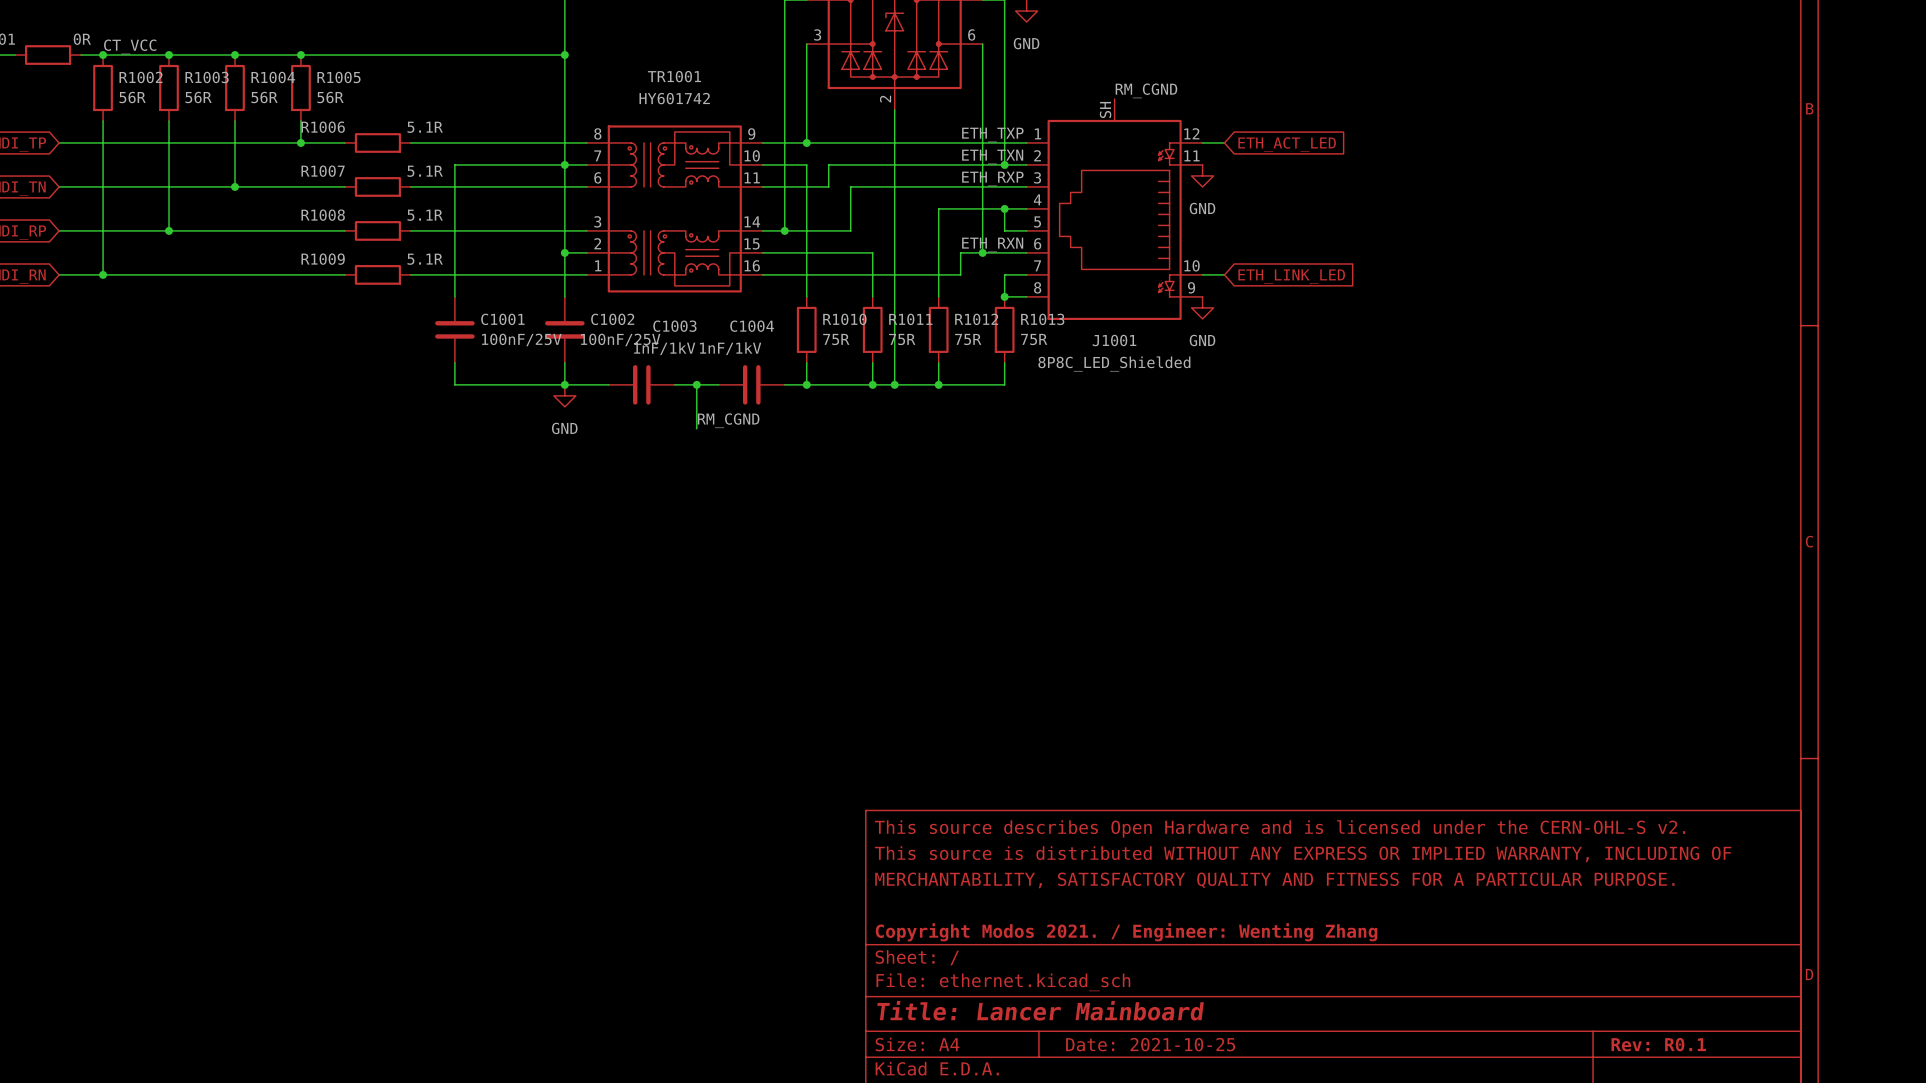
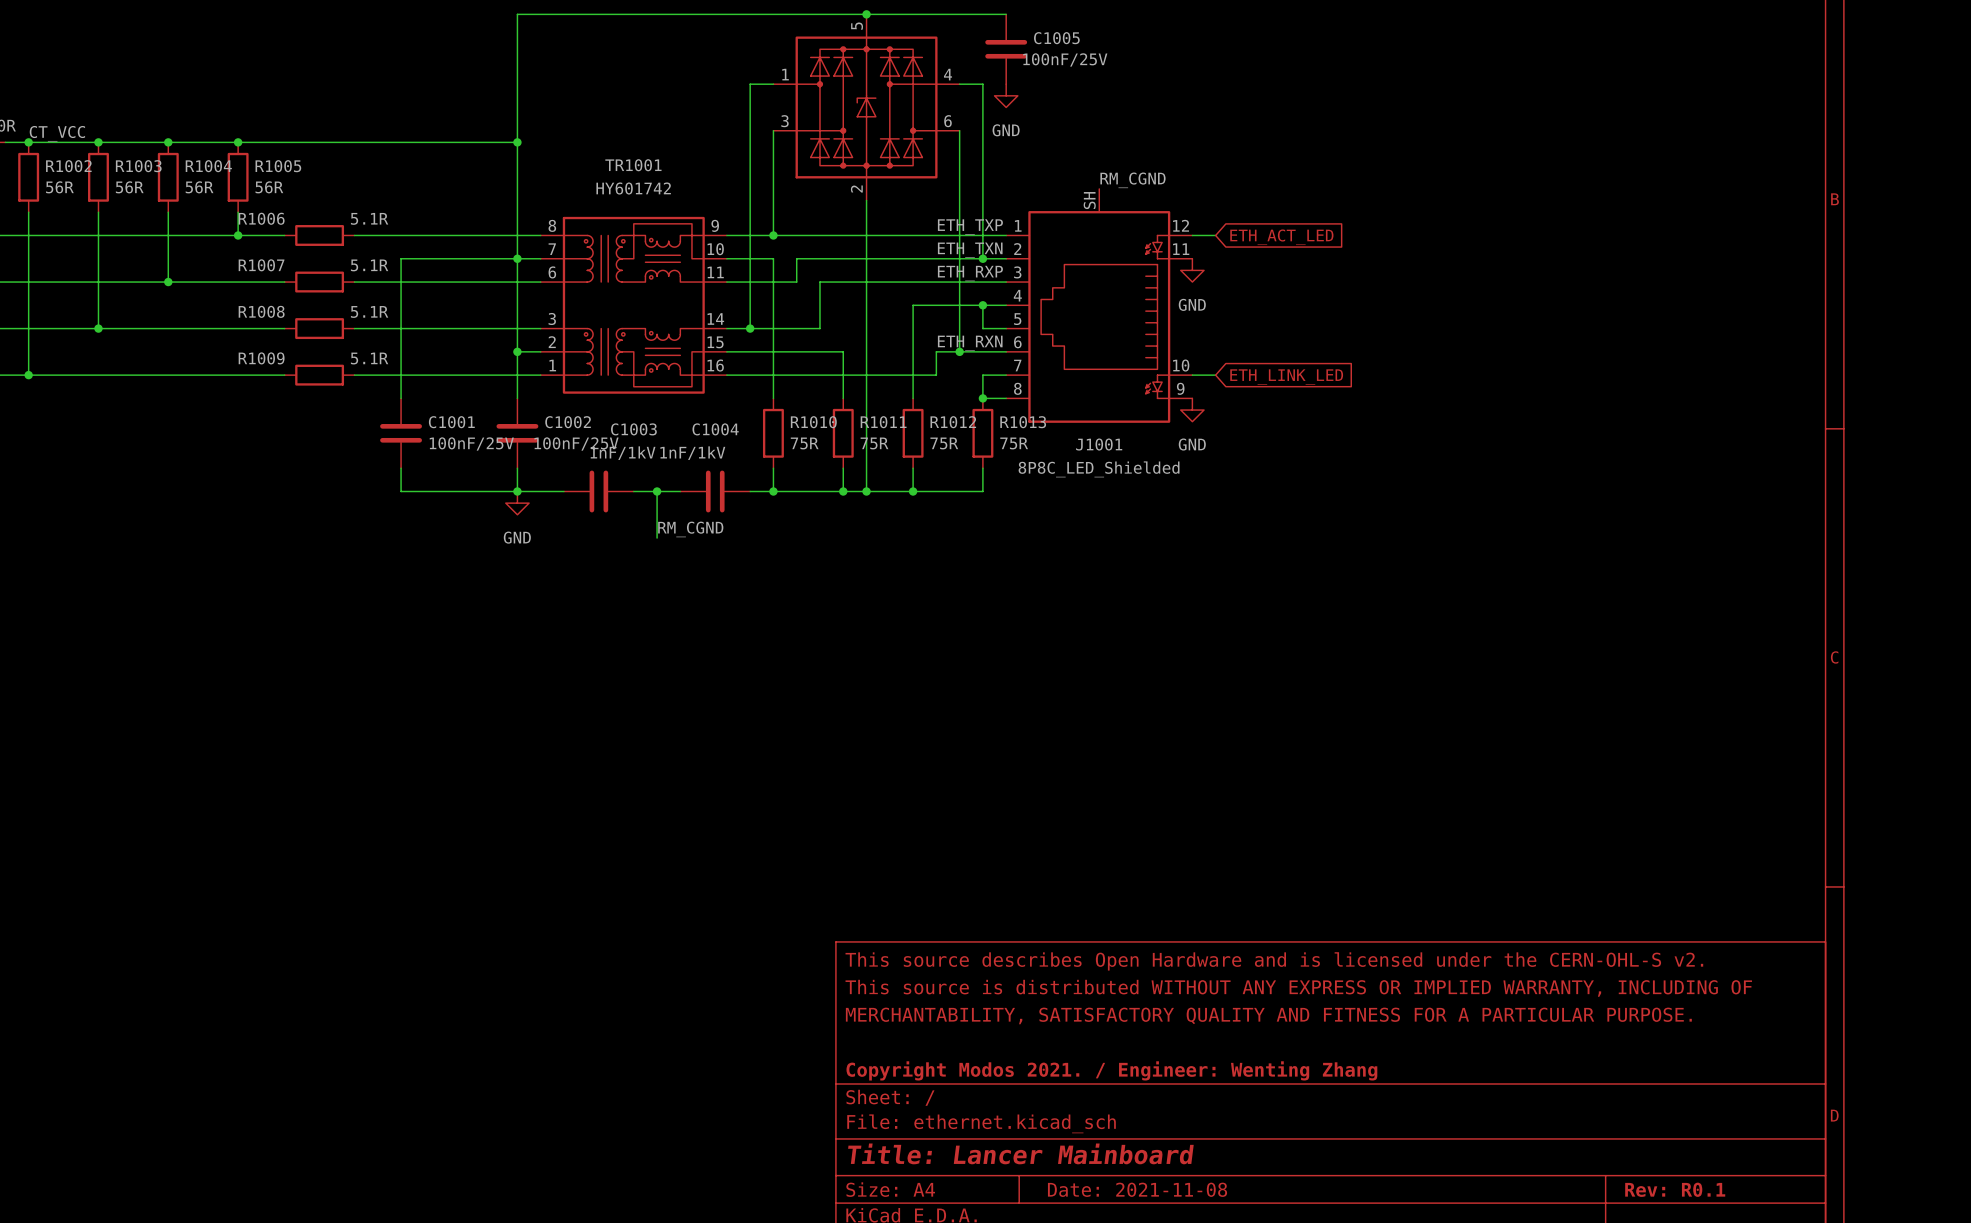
title block: Date: 2021-10-25 (1150, 1044) -> Date: 2021-11-08 (1137, 1189)

